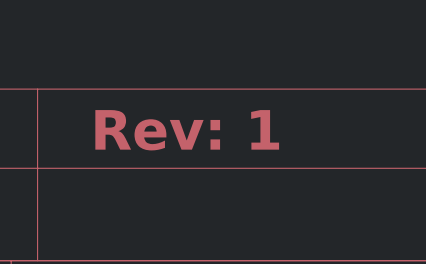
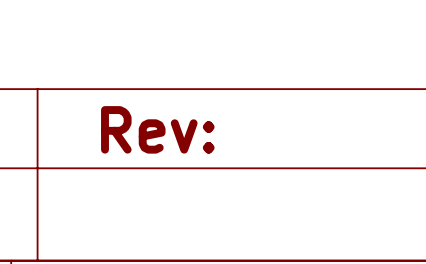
title block: Rev: 1 (187, 130) -> Rev: (157, 129)

